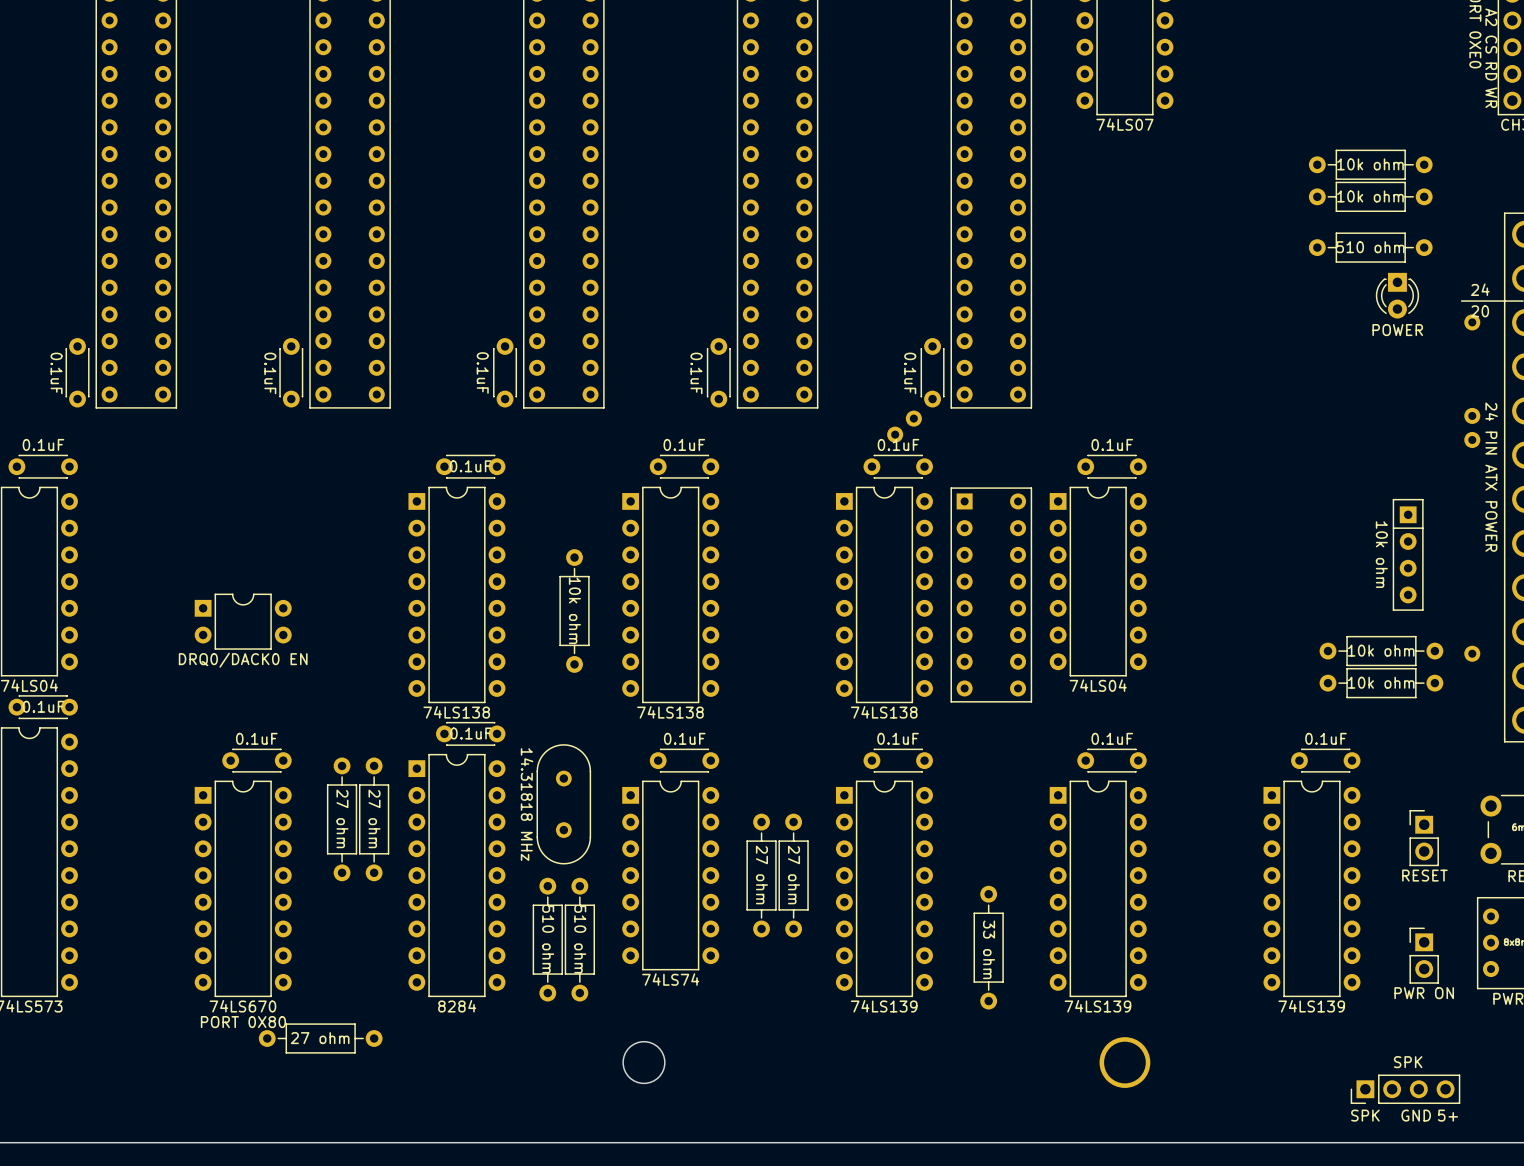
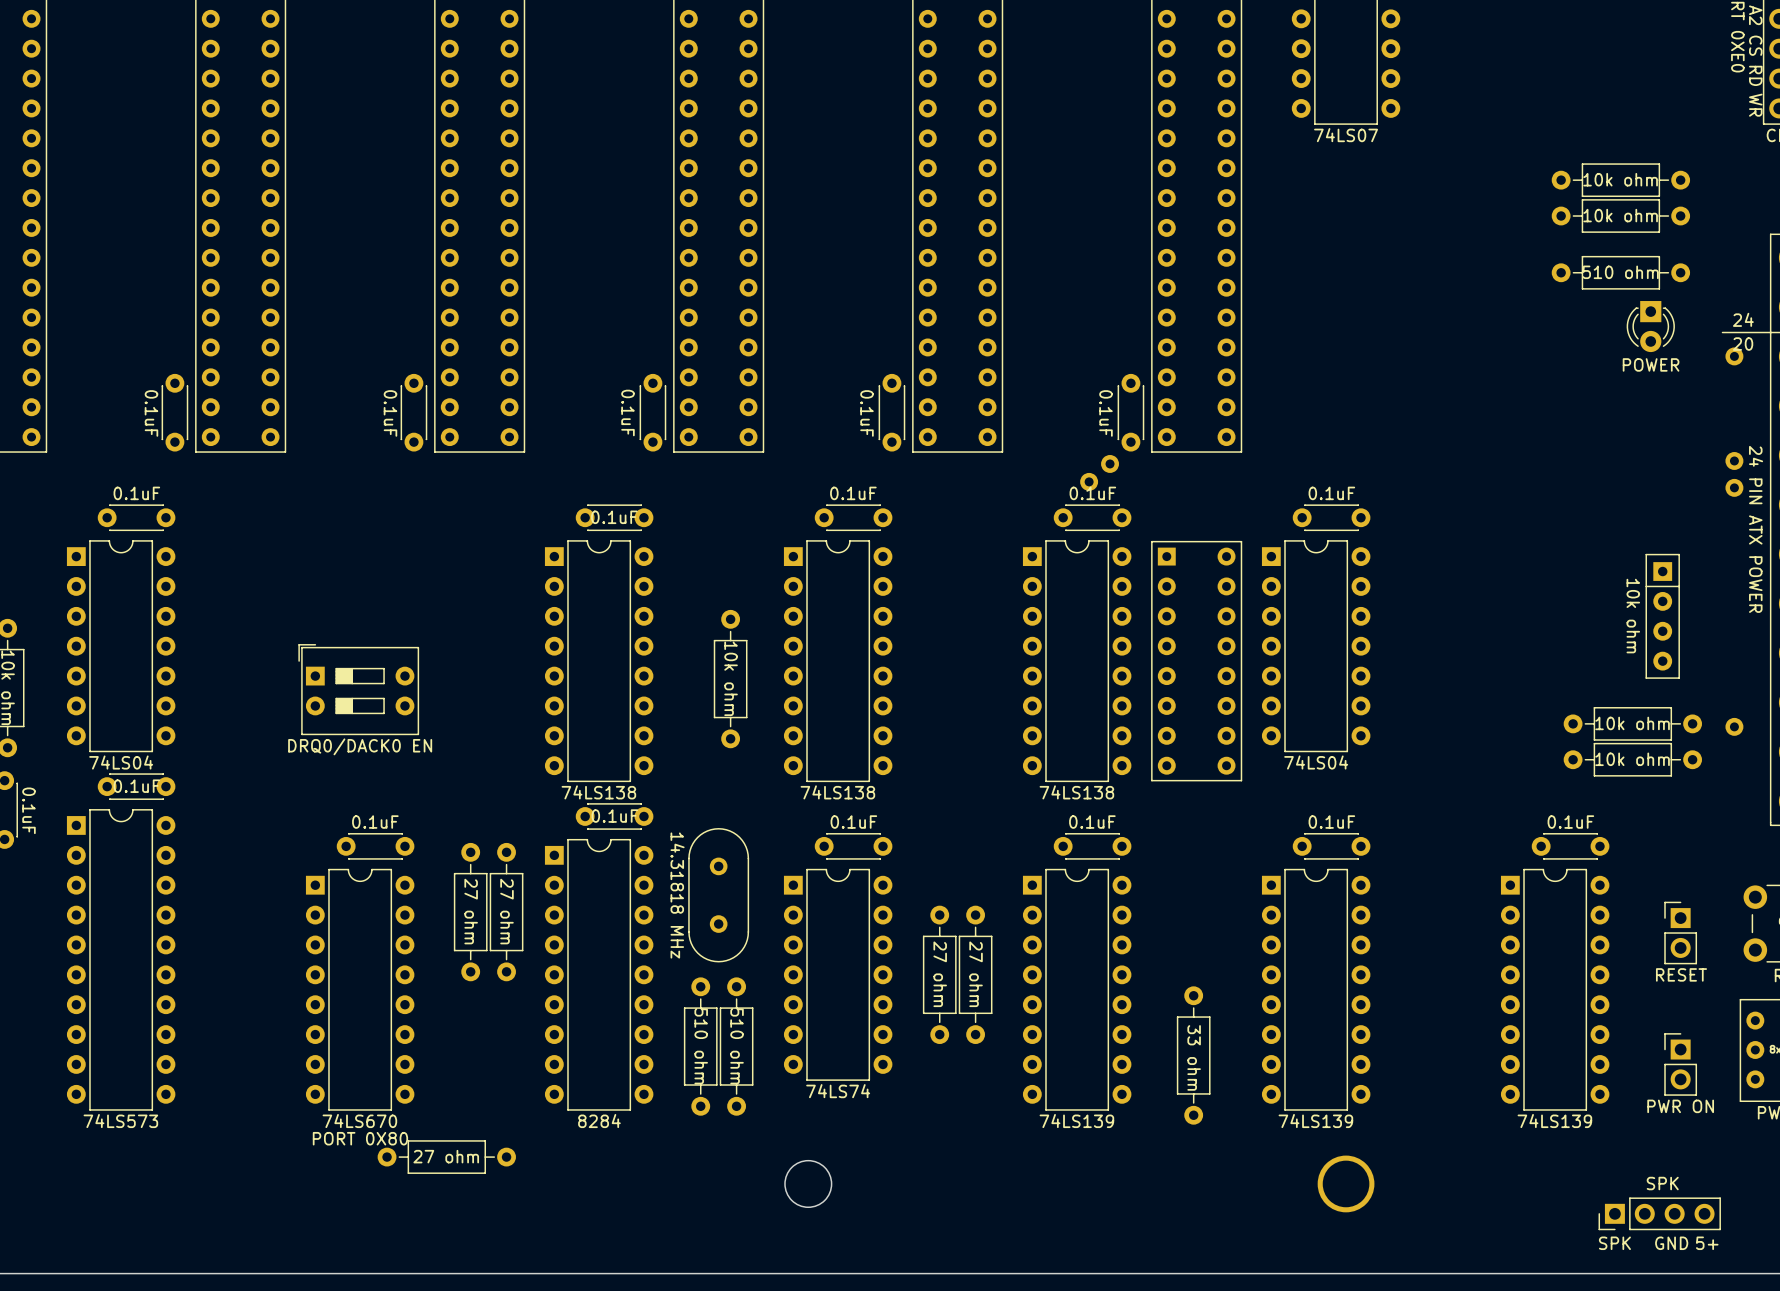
part footprint: [194, 593, 292, 650] -> [298, 644, 420, 736]

